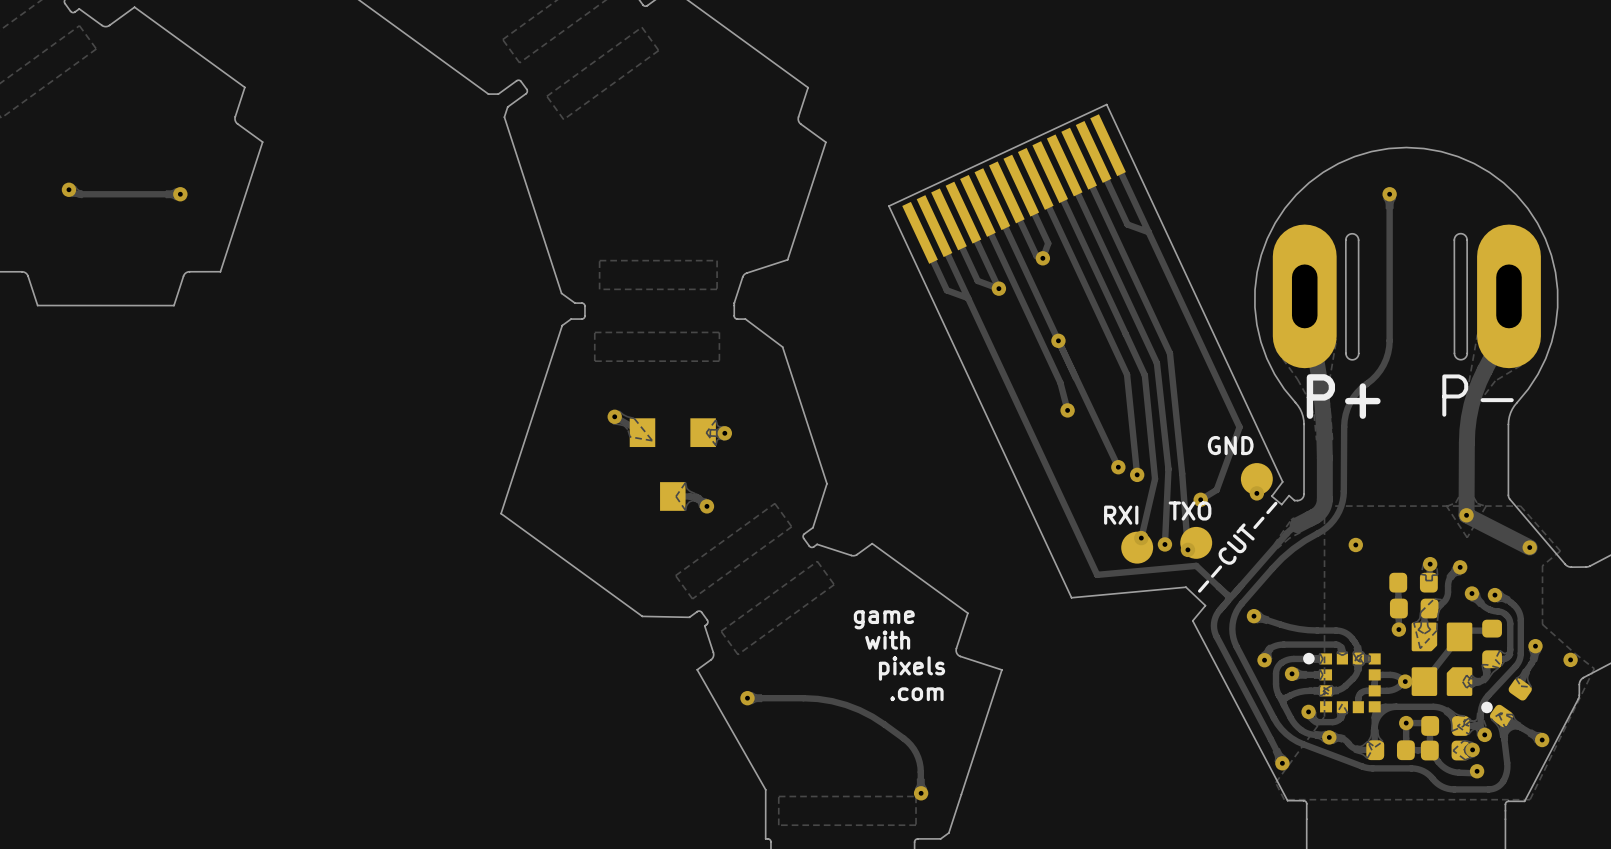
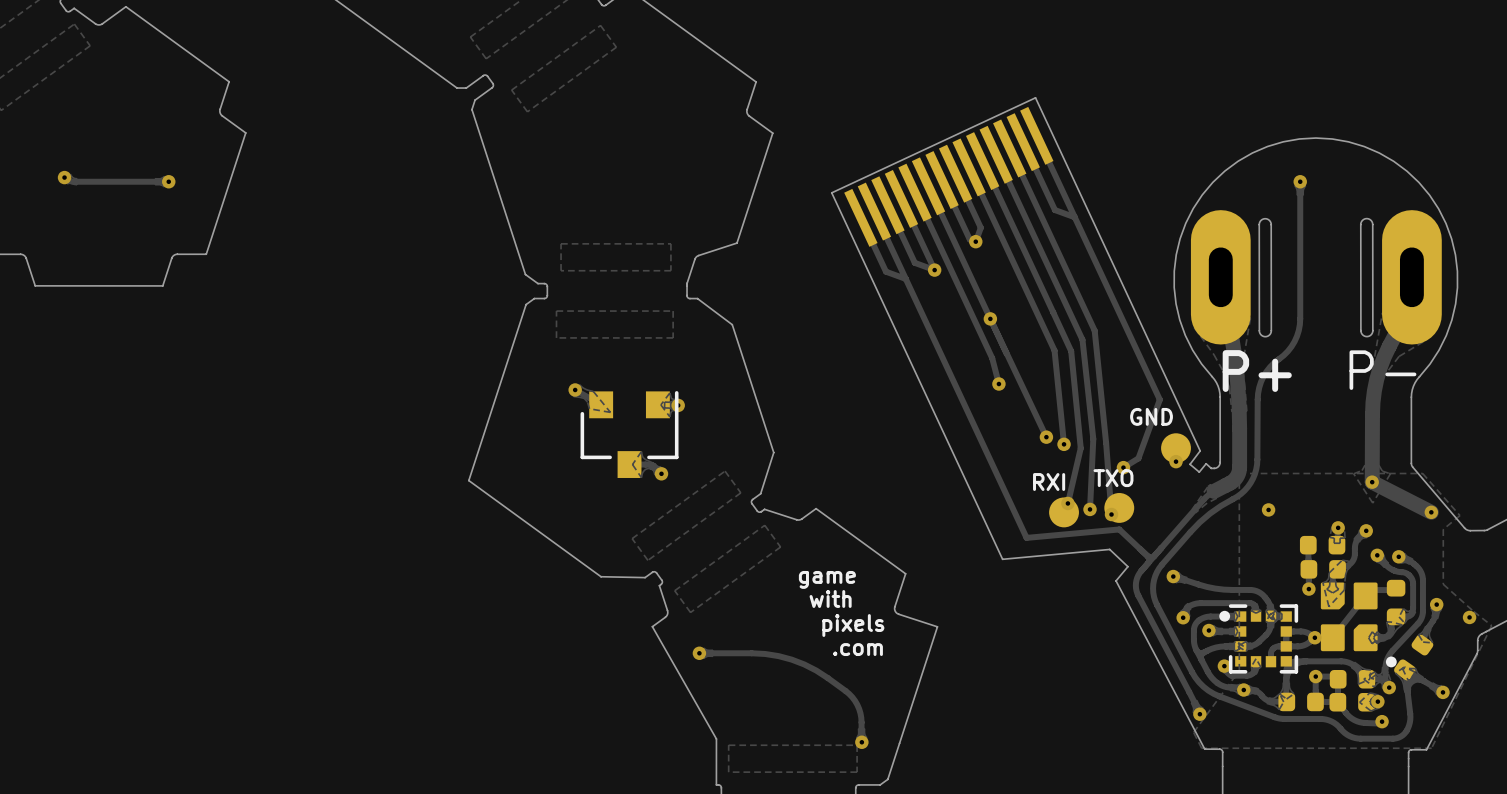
part footprint: [629, 418, 716, 511] -> [580, 391, 679, 478]
text: --CUT-- (1237, 547) -> none
part footprint: [1320, 652, 1381, 714] -> [1228, 604, 1299, 674]

